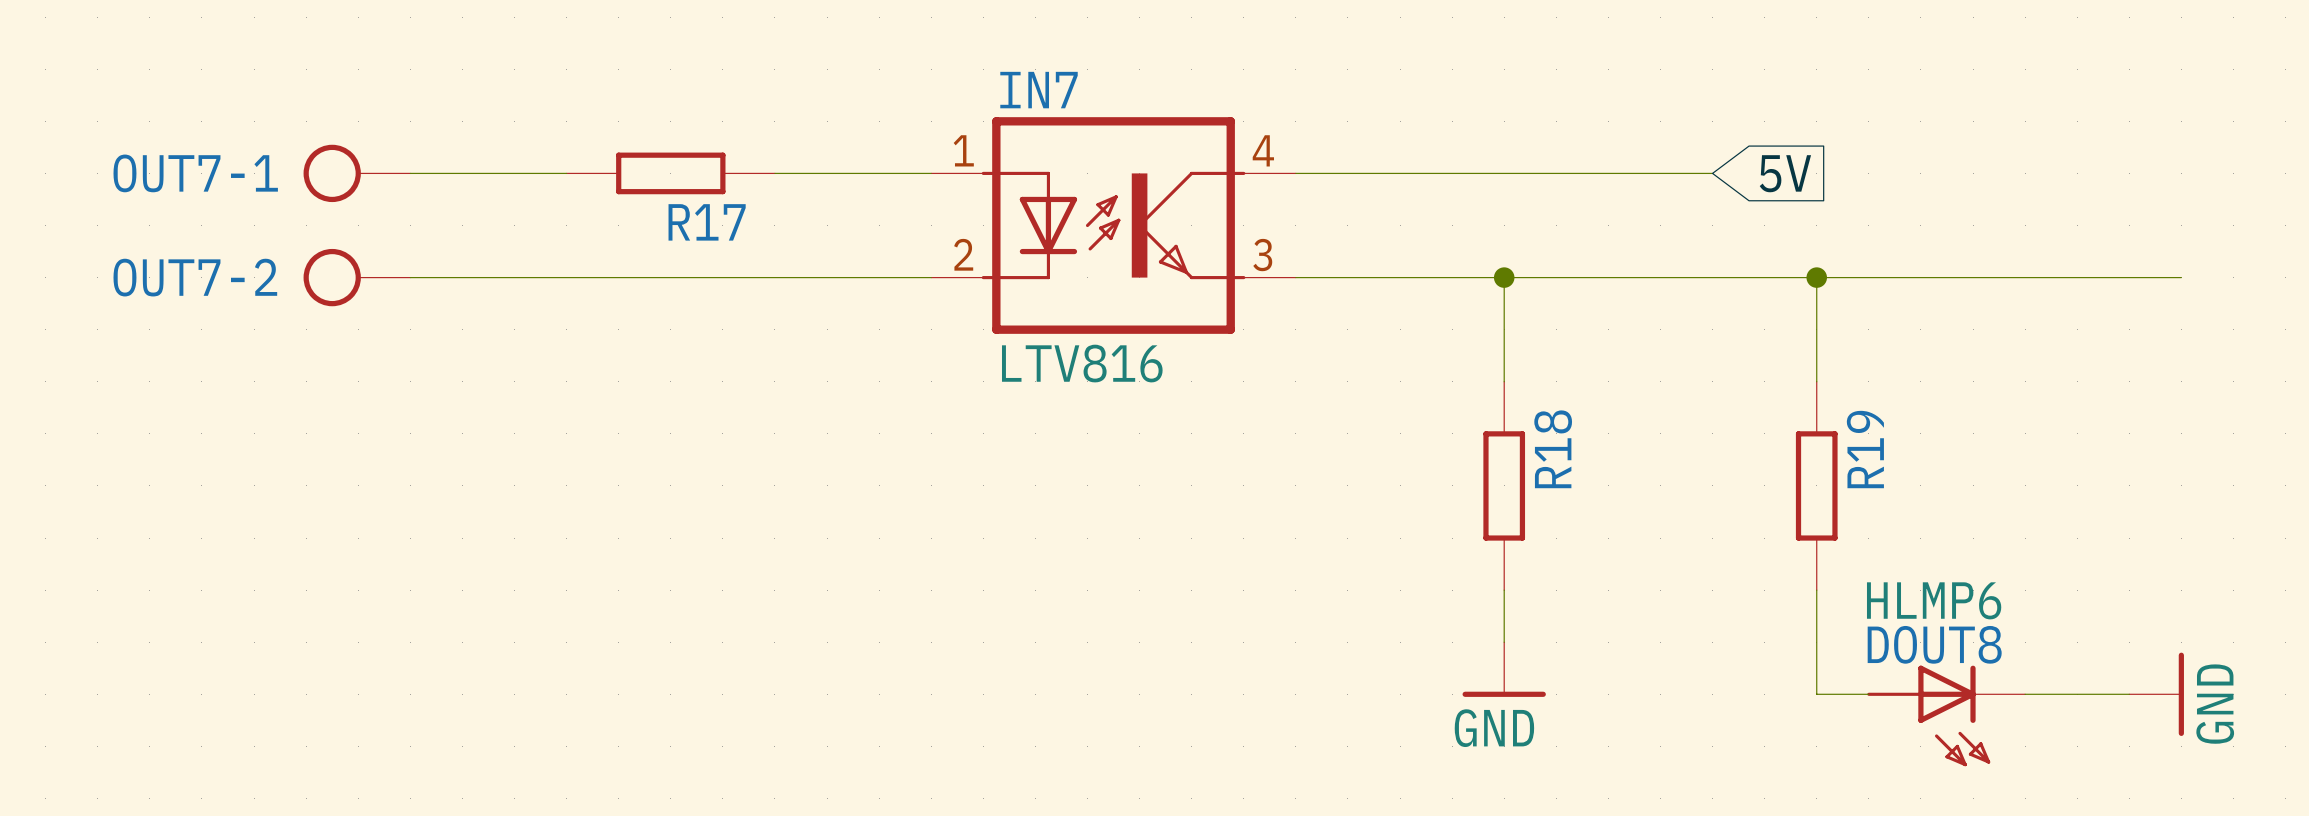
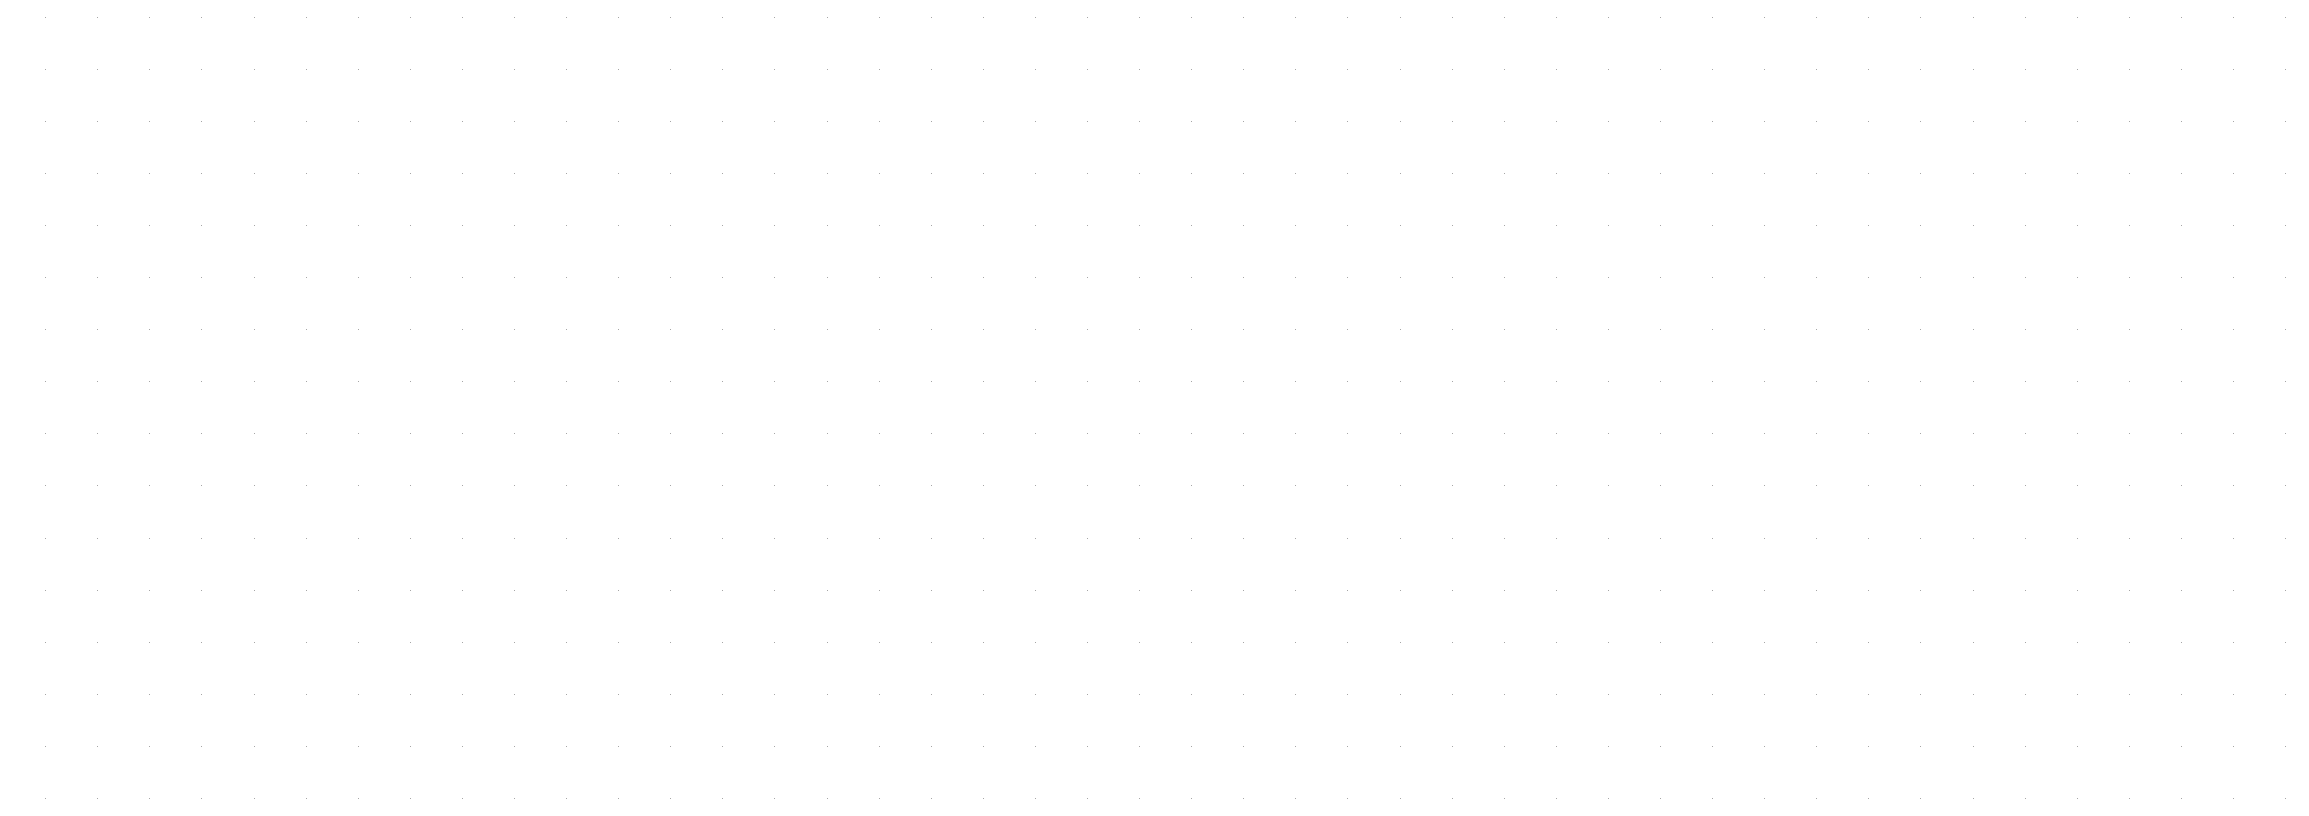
OUT7-1: (356, 173) -> none
wire: (410, 173) (566, 173) -> none
R17: (670, 173) -> none
wire: (774, 173) (931, 173) -> none
wire: (1295, 173) (1712, 173) -> none
global label: 5V (1785, 173) -> none
IN7: LTV816 (1113, 225) -> none
OUT7-2: (356, 277) -> none
wire: (410, 277) (931, 277) -> none
wire: (1295, 277) (2181, 277) -> none
wire: (1504, 277) (1504, 381) -> none
junction: (1504, 277) -> none
wire: (1816, 277) (1816, 381) -> none
junction: (1816, 277) -> none
R18: (1504, 485) -> none
R19: (1816, 485) -> none
wire: (1504, 590) (1504, 642) -> none
wire: (1816, 590) (1816, 694) (1868, 694) -> none
power symbol: GND (1504, 669) -> none
wire: (2025, 694) (2129, 694) -> none
power symbol: GND (2156, 694) -> none
DOUT8: HLMP6 (1946, 715) -> none

